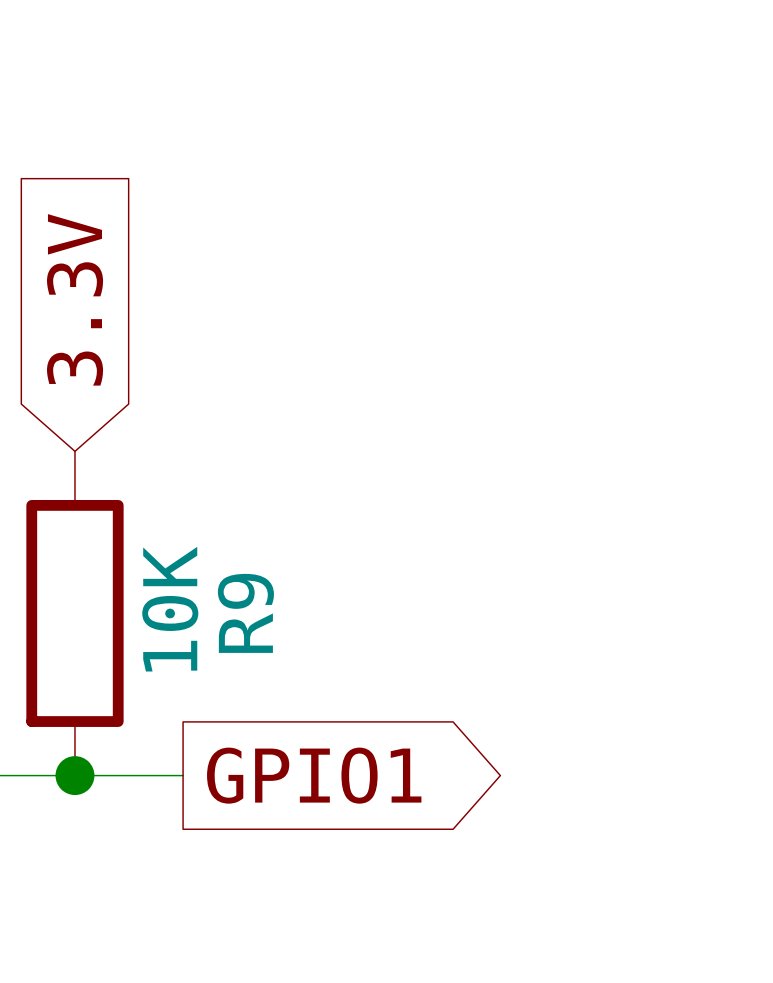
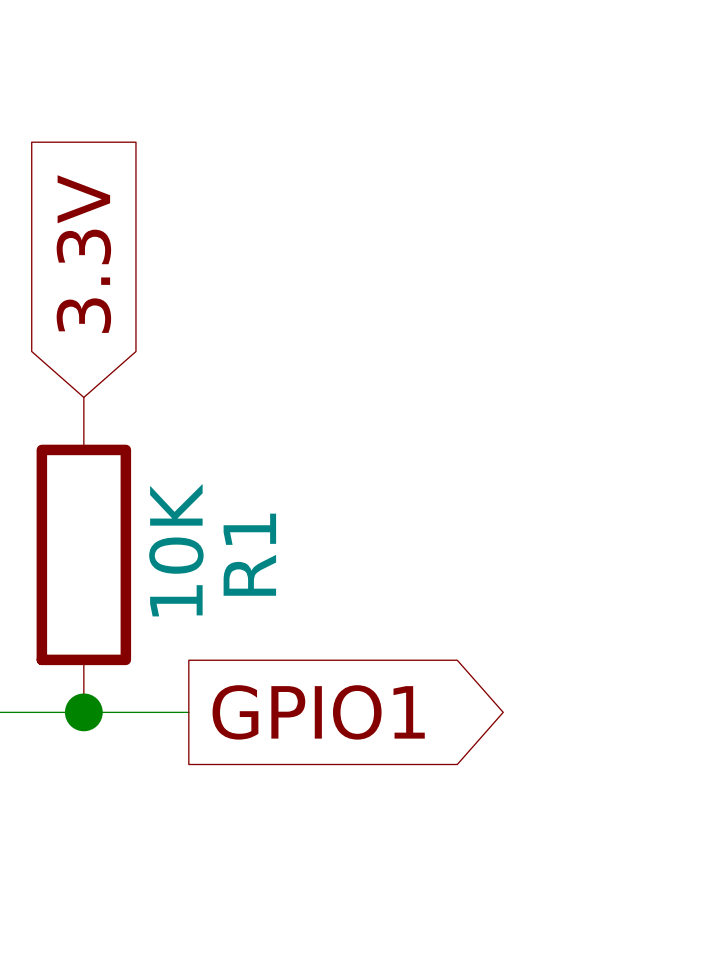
R9 name: R9 (245, 613) -> R1 (249, 554)

